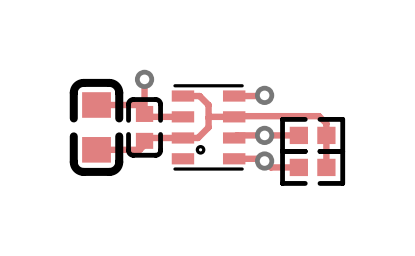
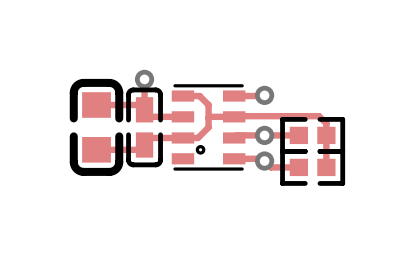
part footprint: [126, 97, 163, 158] -> [126, 87, 163, 168]

